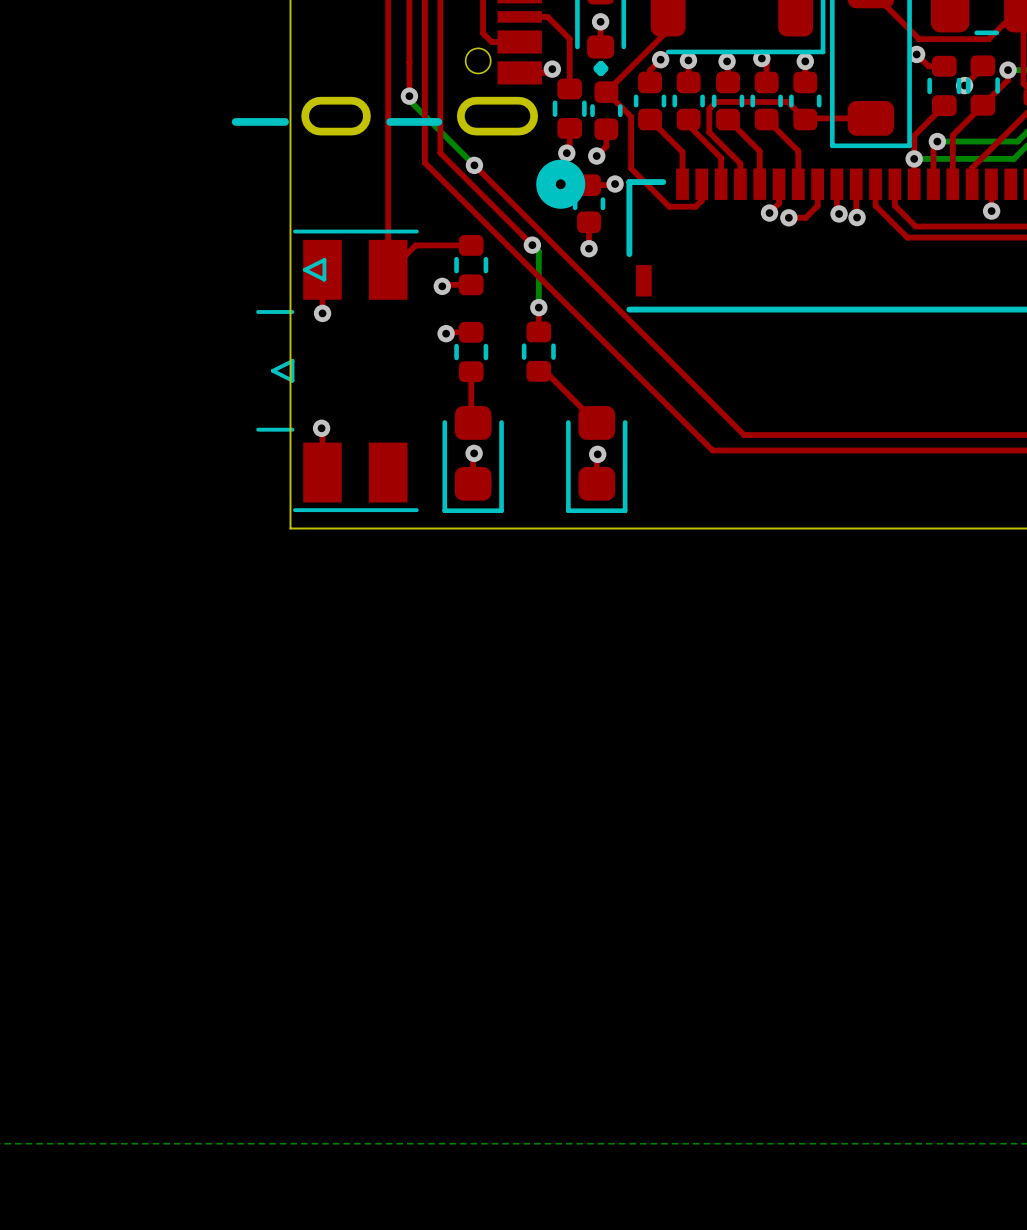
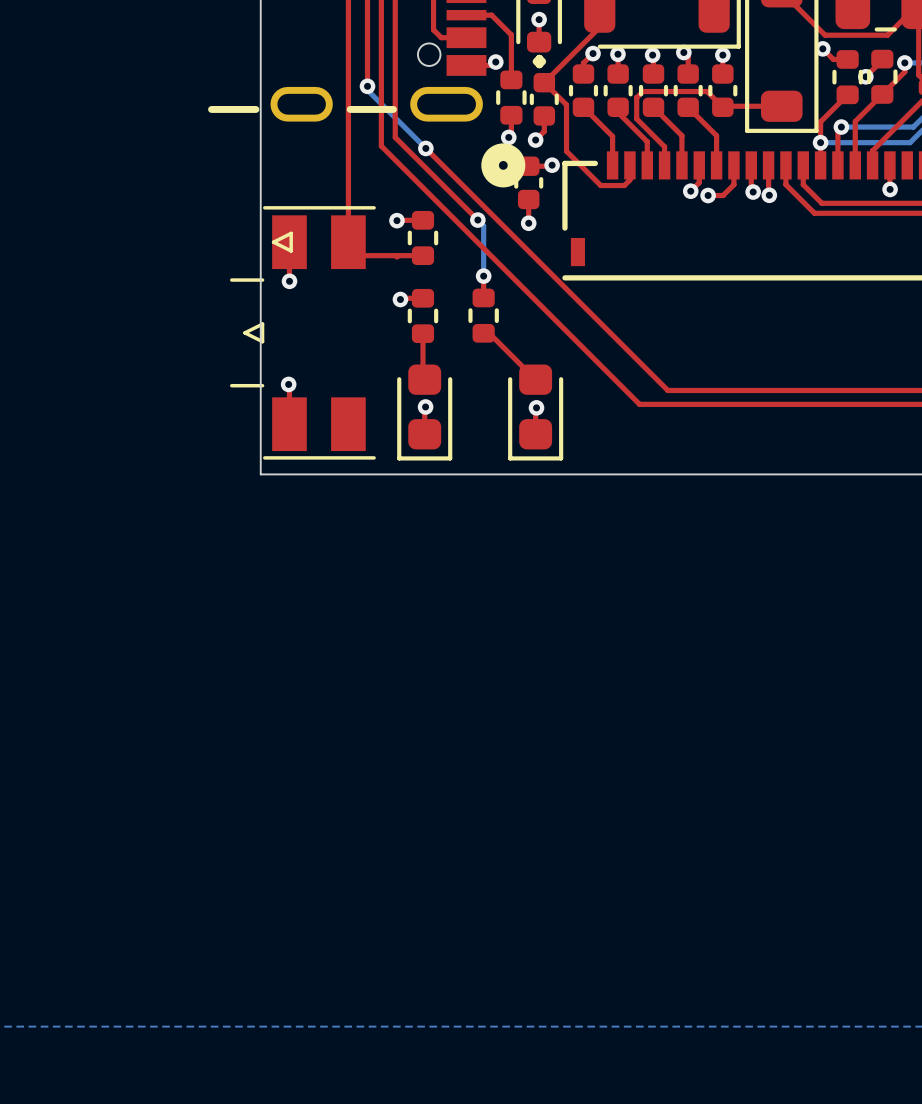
top track: (442, 245) (415, 245) (391, 269) (388, 269) -> (398, 255) (361, 255) (348, 242)
via position: (442, 286) -> (396, 220)

